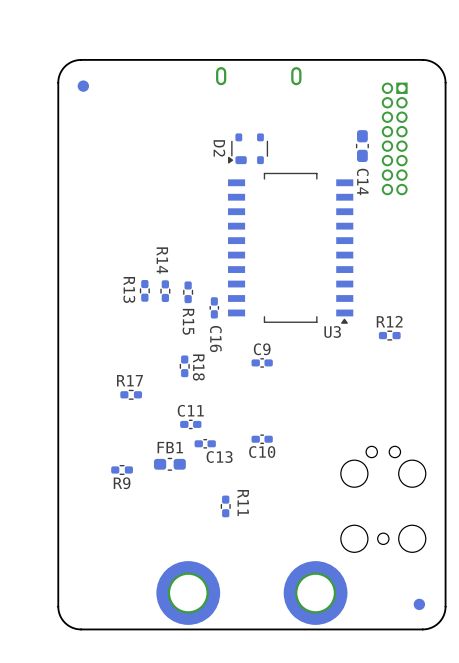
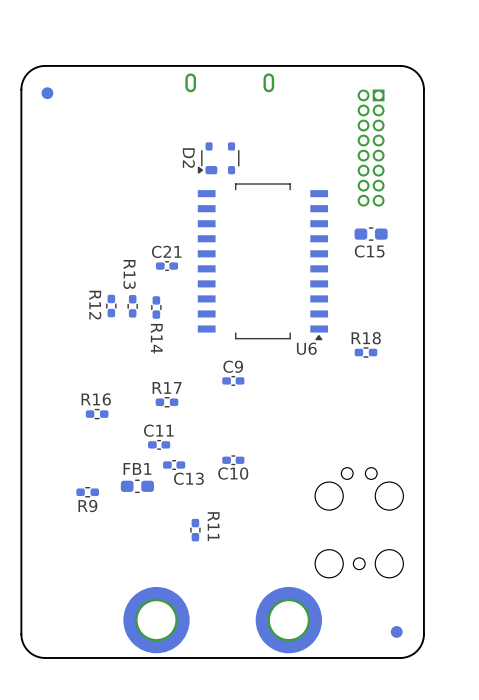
C14: (362, 146) -> none
C15: none -> (371, 234)
C21: none -> (167, 266)
R14 name: R14 (162, 260) -> R13 (129, 274)
R13 name: R13 (129, 289) -> R12 (95, 305)
C16: (214, 307) -> none
R15 name: R15 (188, 321) -> R14 (156, 338)
R12 name: R12 (389, 321) -> R18 (366, 338)
U3 name: U3 (332, 331) -> U6 (306, 348)
R18: (184, 366) -> none
R17 name: R17 (130, 380) -> R16 (96, 399)
R17: none -> (167, 402)

